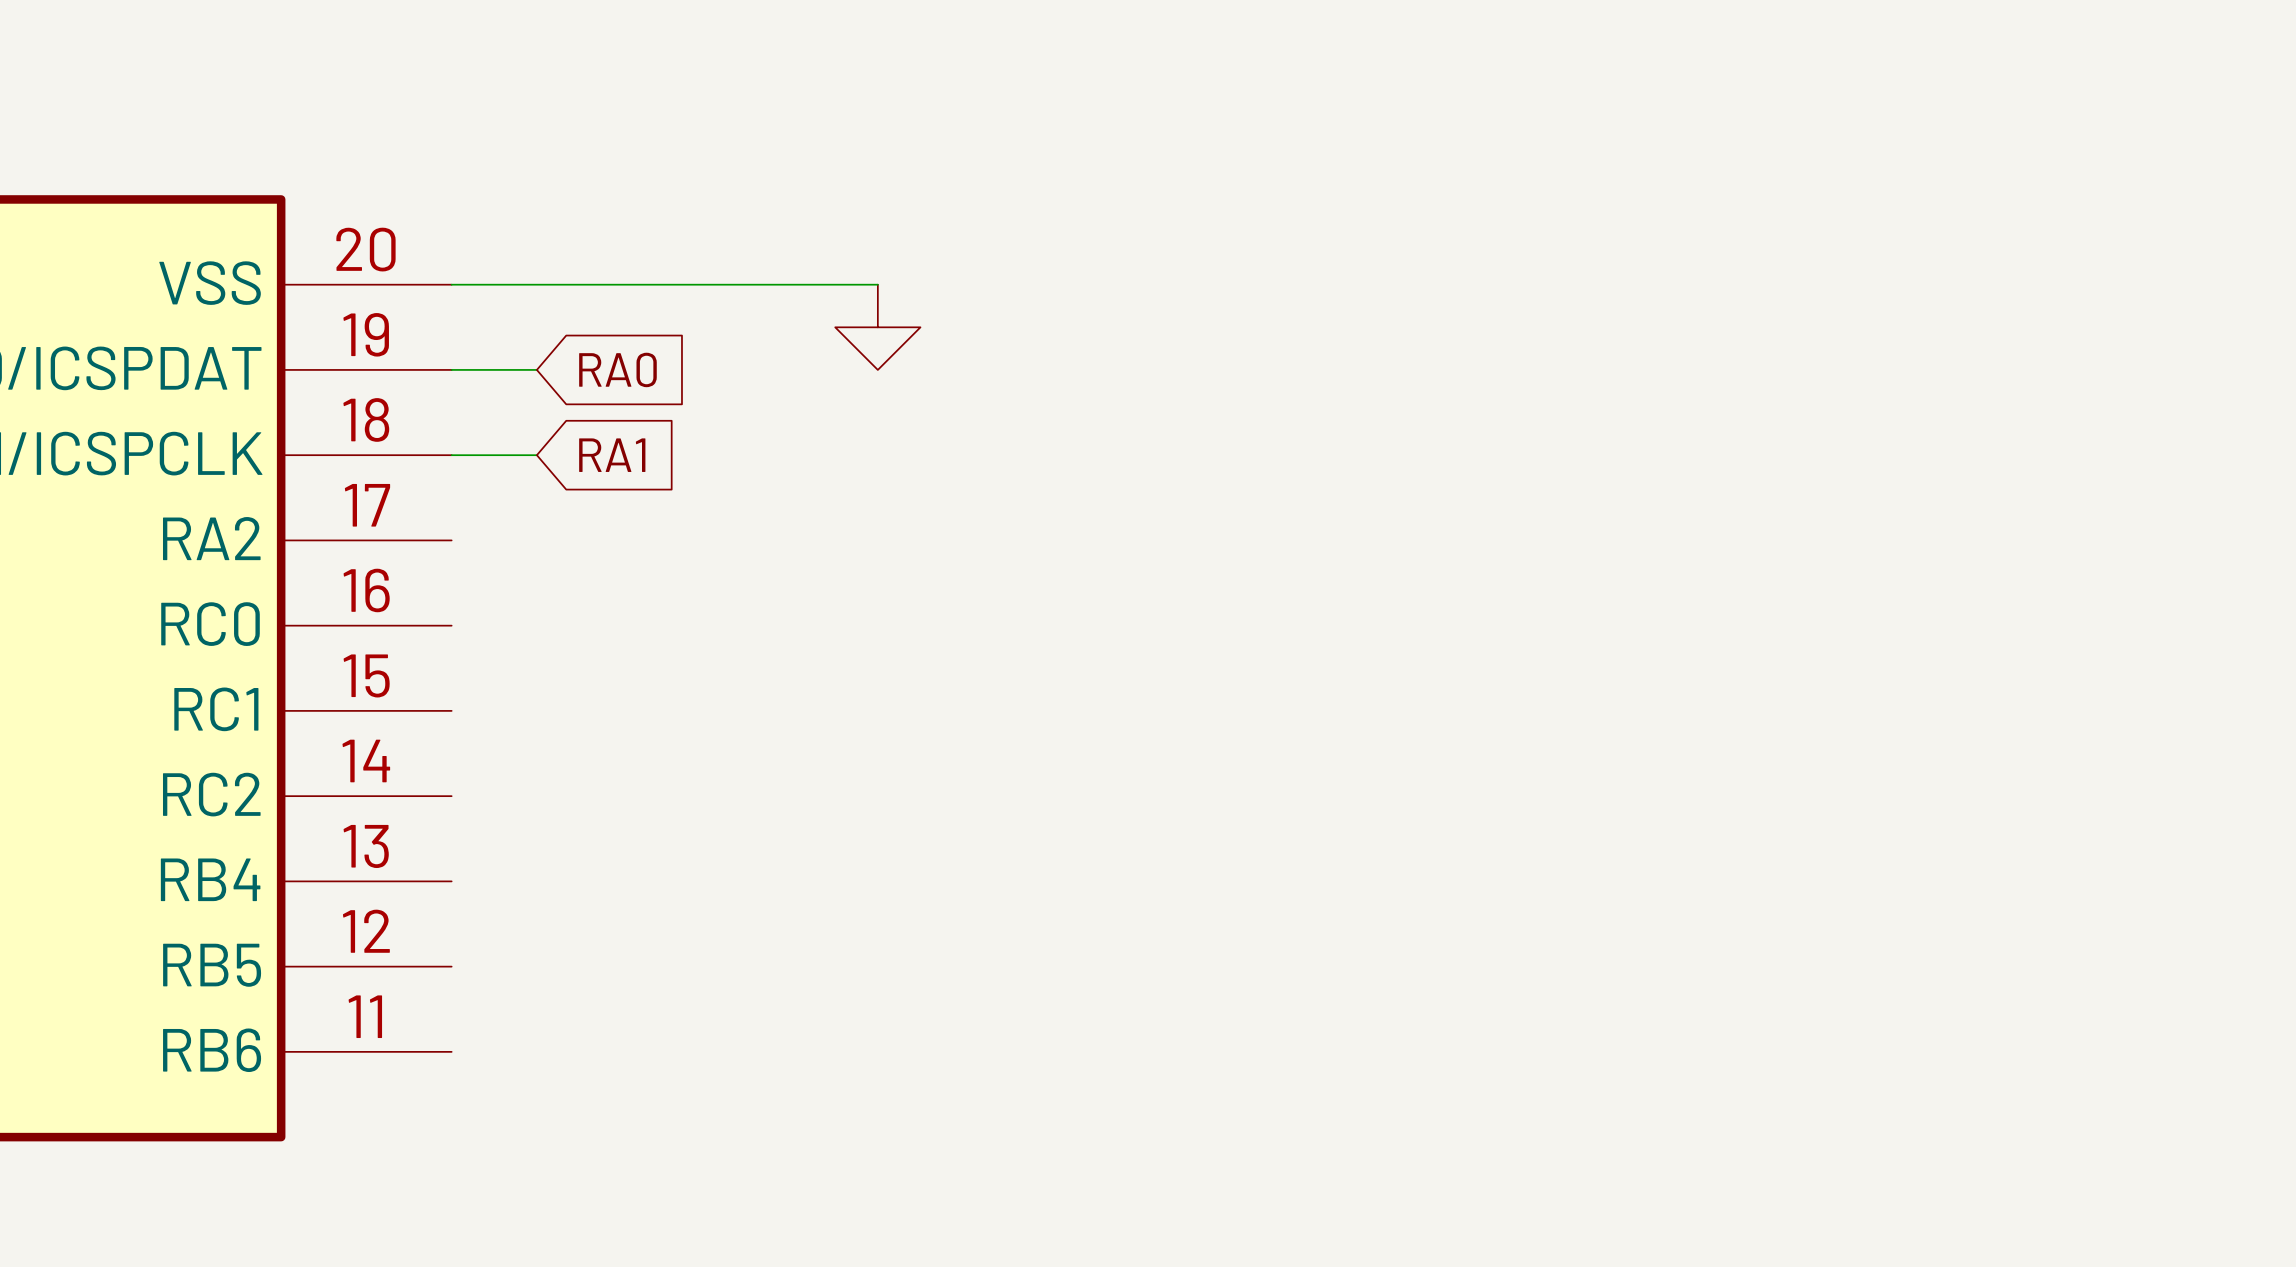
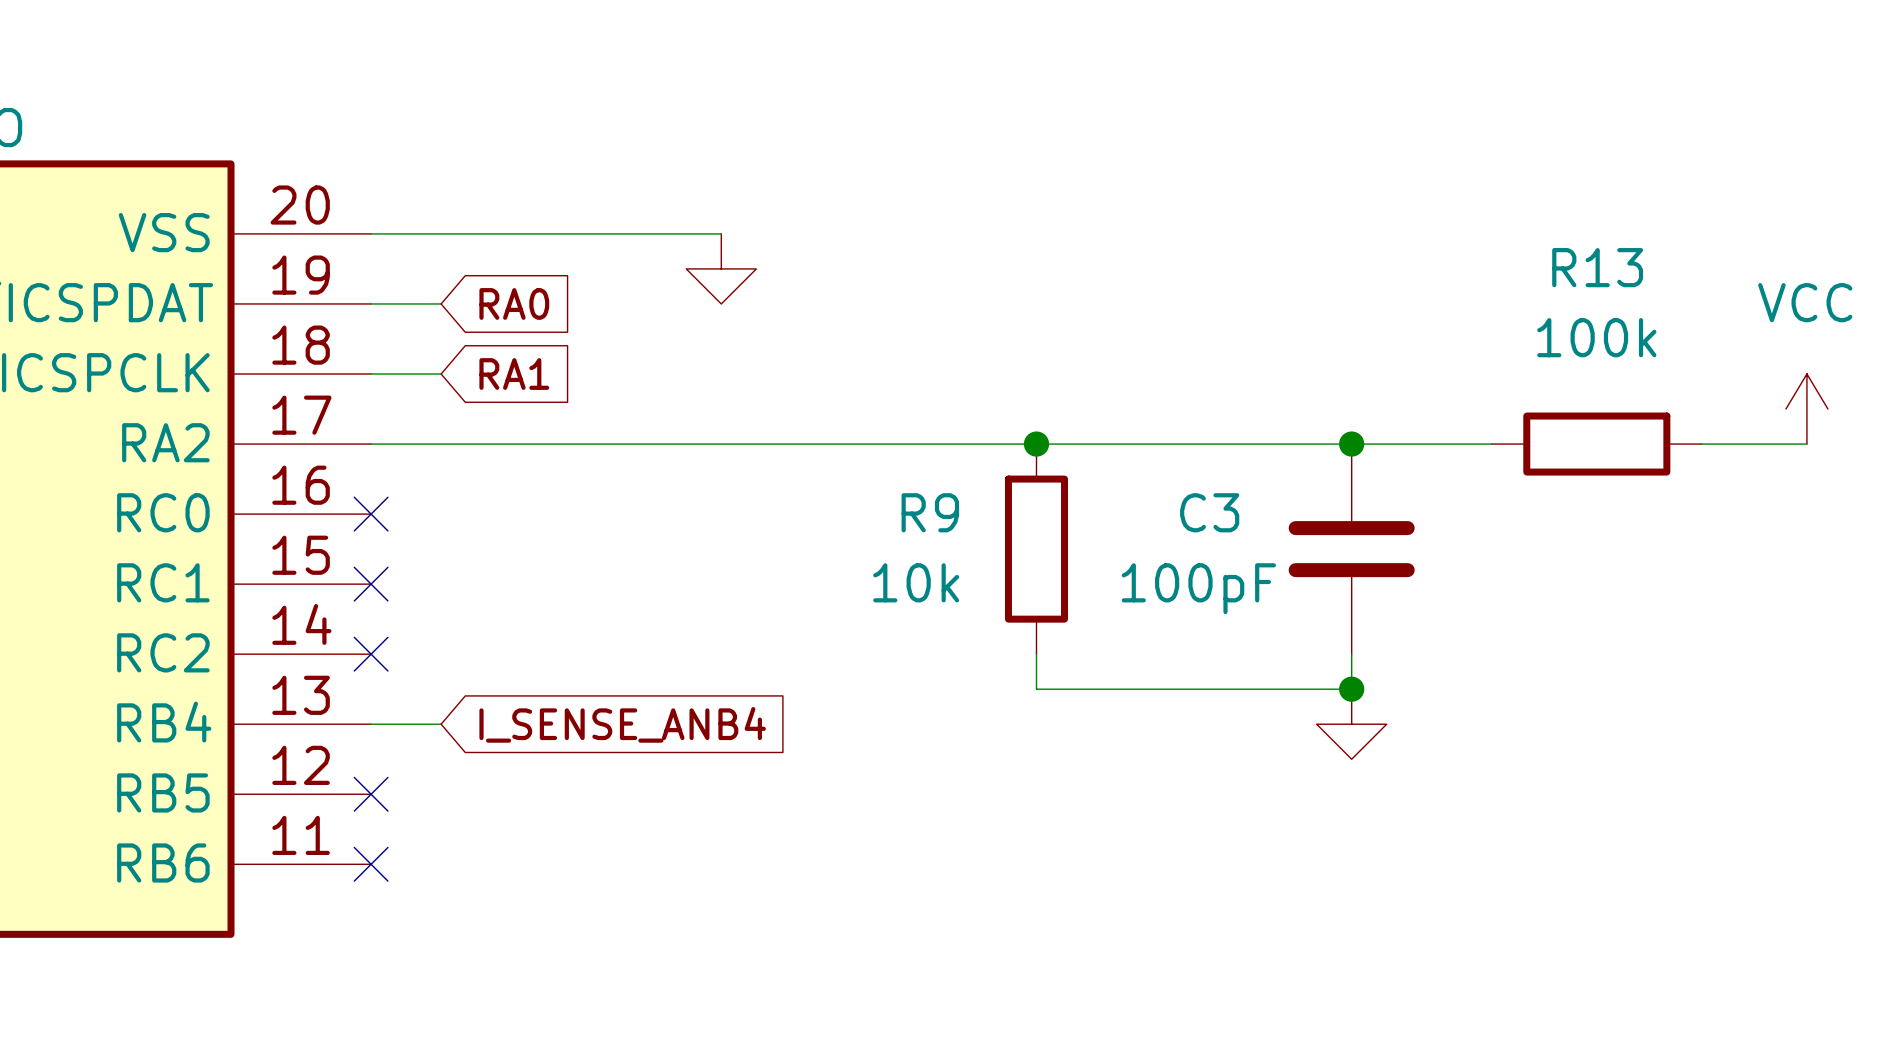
power symbol: none -> VCC (1806, 409)
wire: none -> (371, 444) (1491, 444)
junction: none -> (1036, 444)
junction: none -> (1351, 444)
R13: none -> 100k (1596, 444)
wire: none -> (1701, 444) (1806, 444)
no-connect mark: none -> (371, 514)
R9: none -> 10k (1036, 549)
C3: none -> 100pF (1351, 549)
no-connect mark: none -> (371, 584)
no-connect mark: none -> (371, 654)
wire: none -> (1036, 654) (1036, 689) (1351, 689) (1351, 654)
junction: none -> (1351, 689)
wire: none -> (371, 724) (441, 724)
global label: none -> I_SENSE_ANB4 (622, 724)
power symbol: none -> (1351, 724)
no-connect mark: none -> (371, 794)
no-connect mark: none -> (371, 864)

